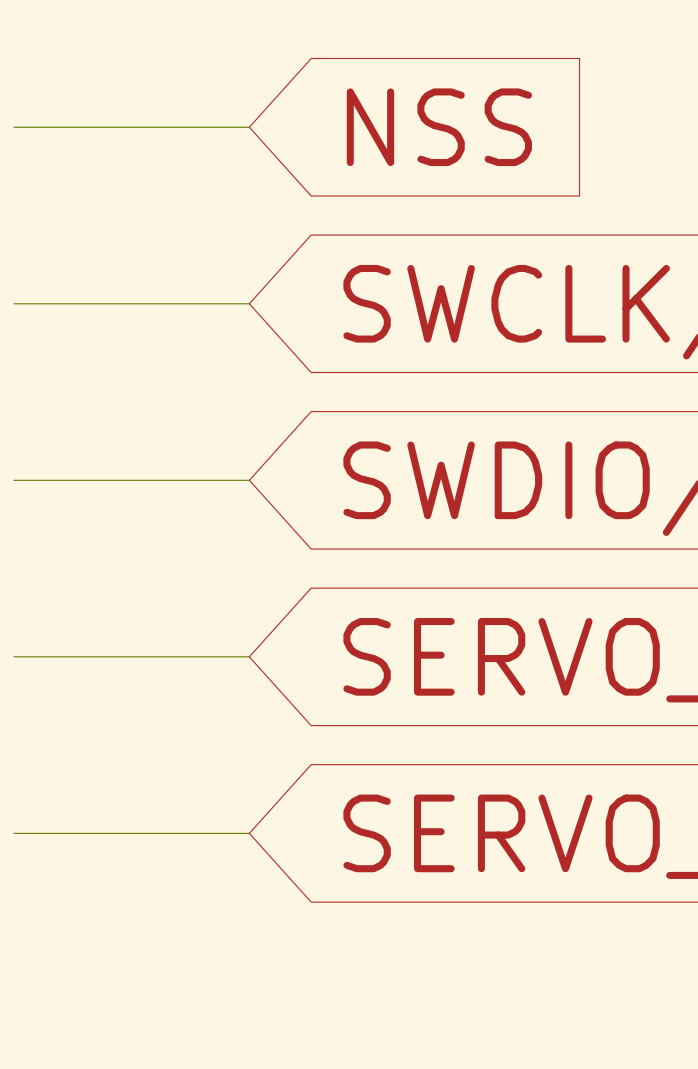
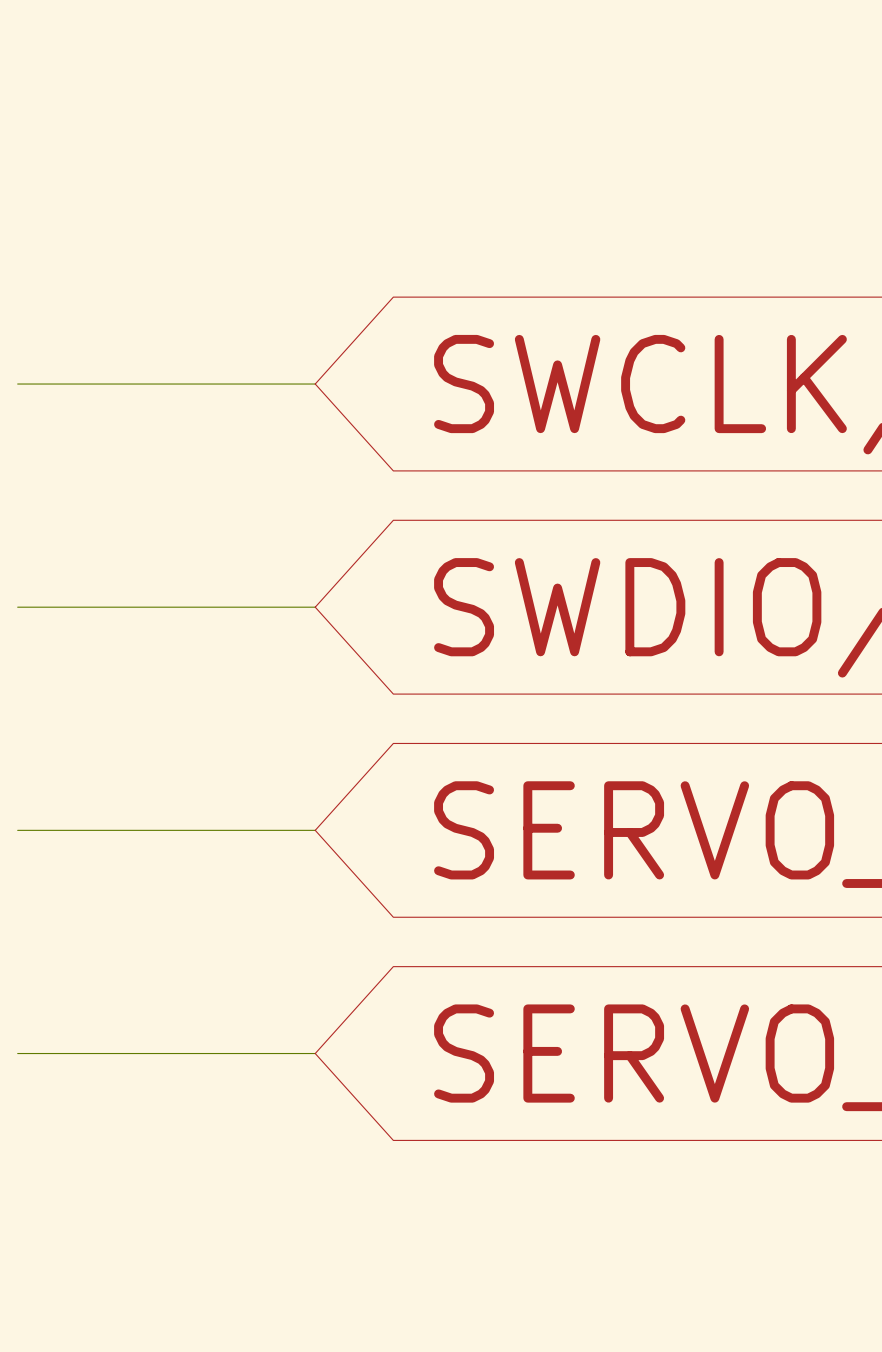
wire: (13, 127) (249, 127) -> none
global label: NSS (439, 127) -> none

